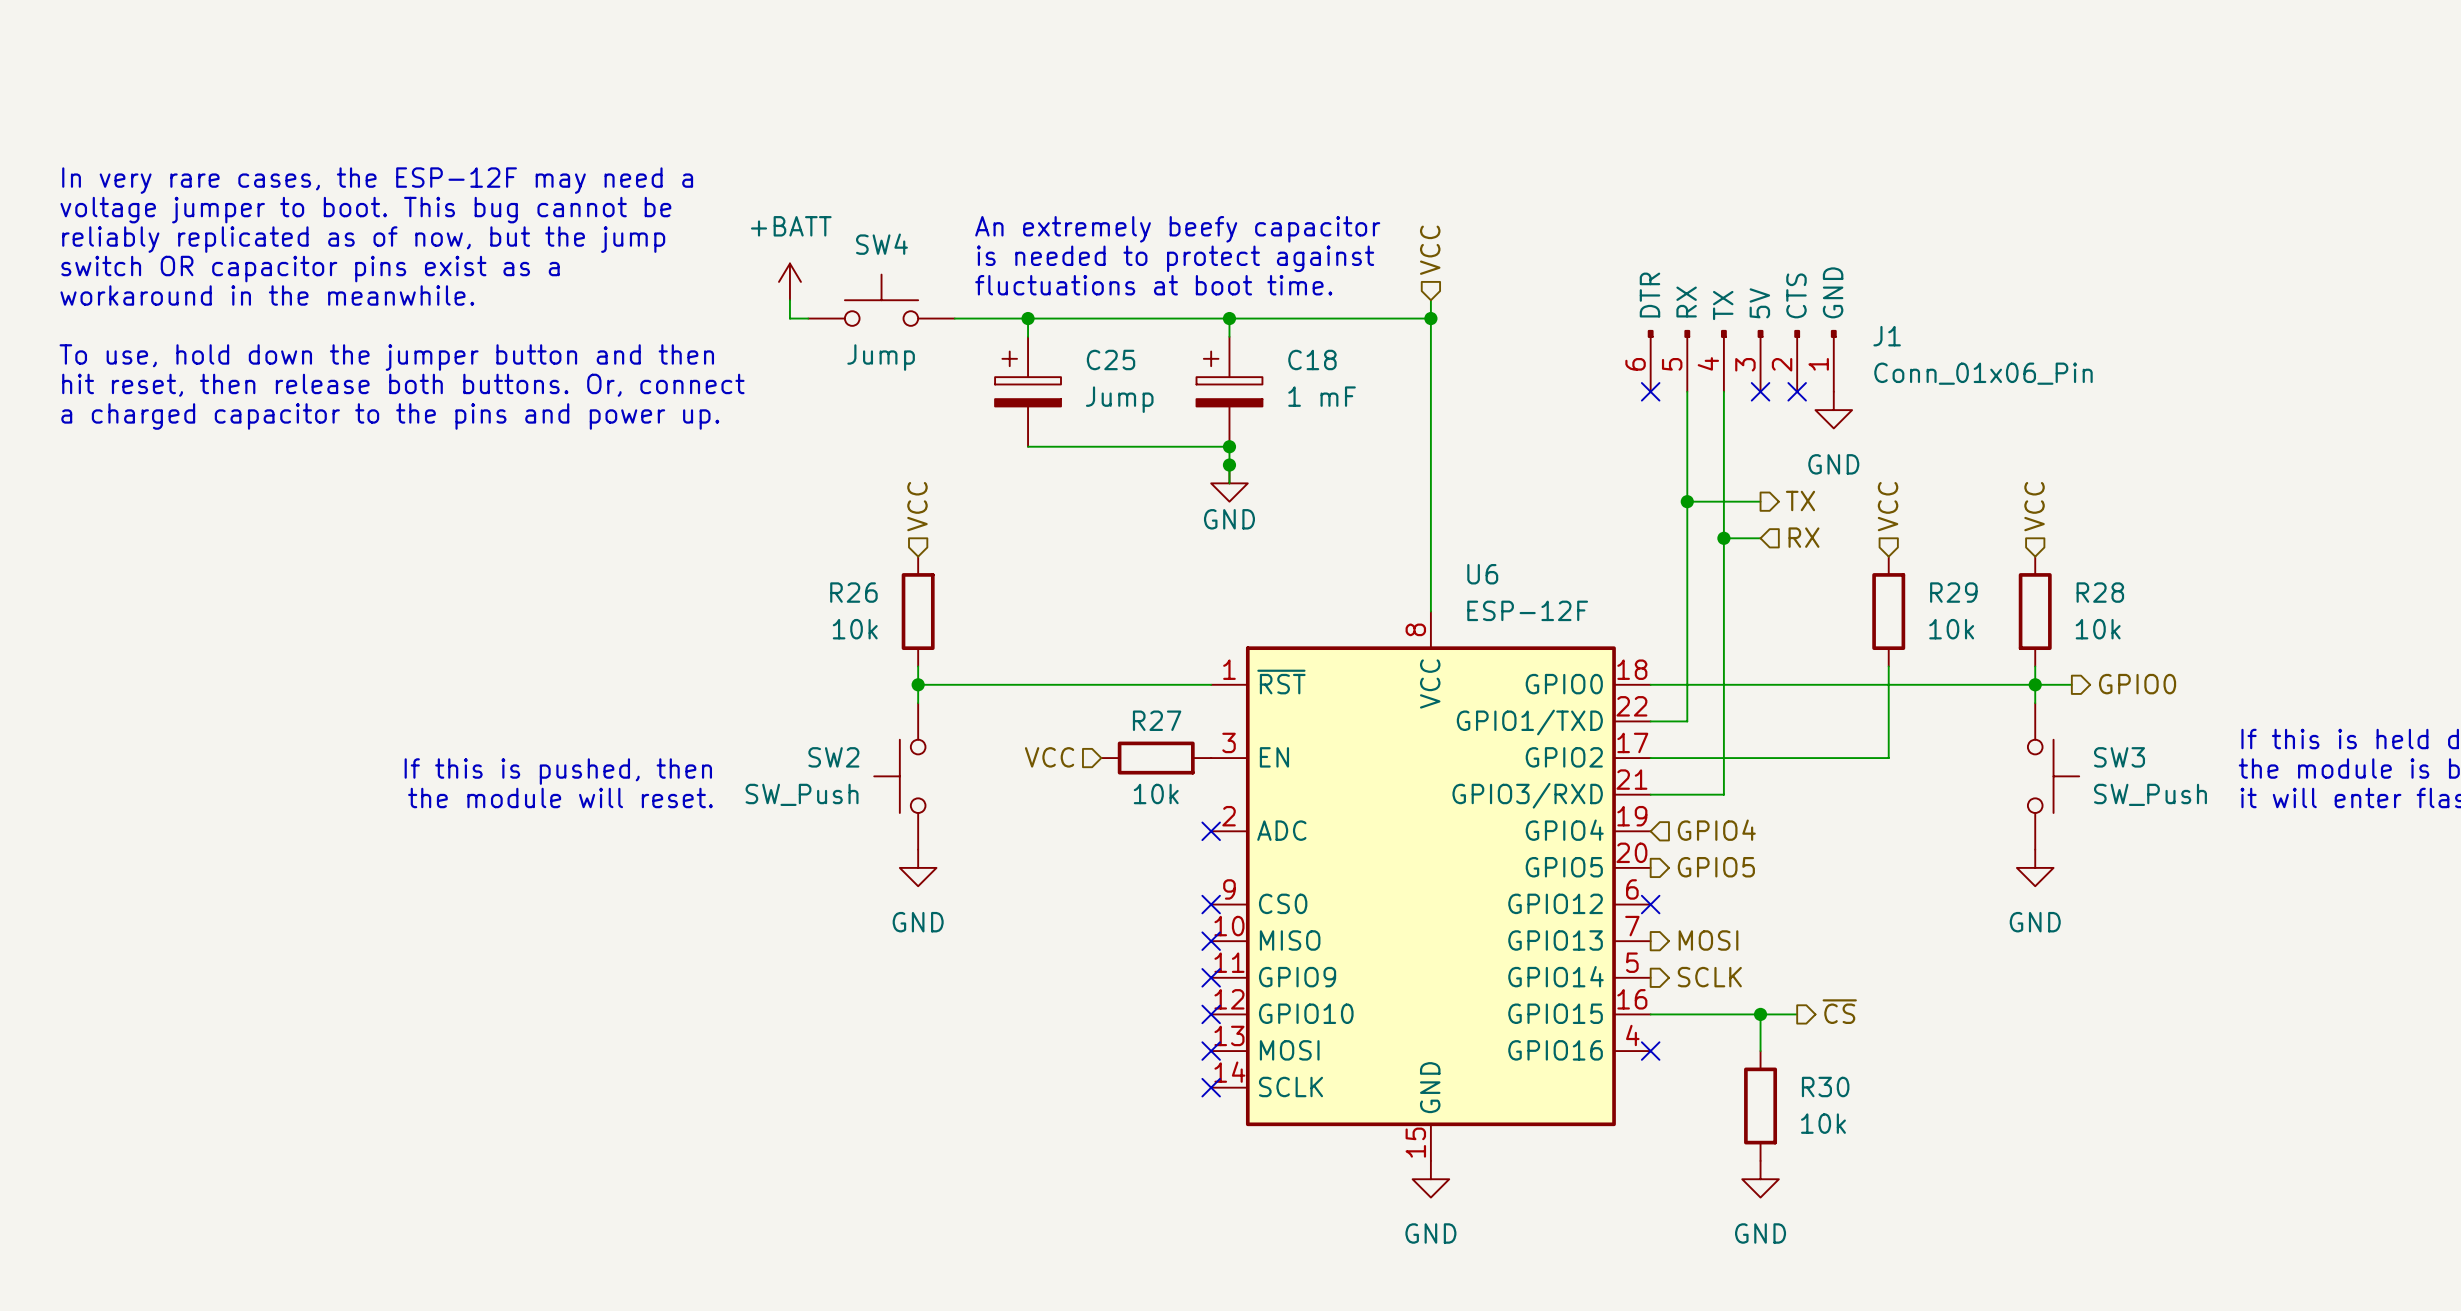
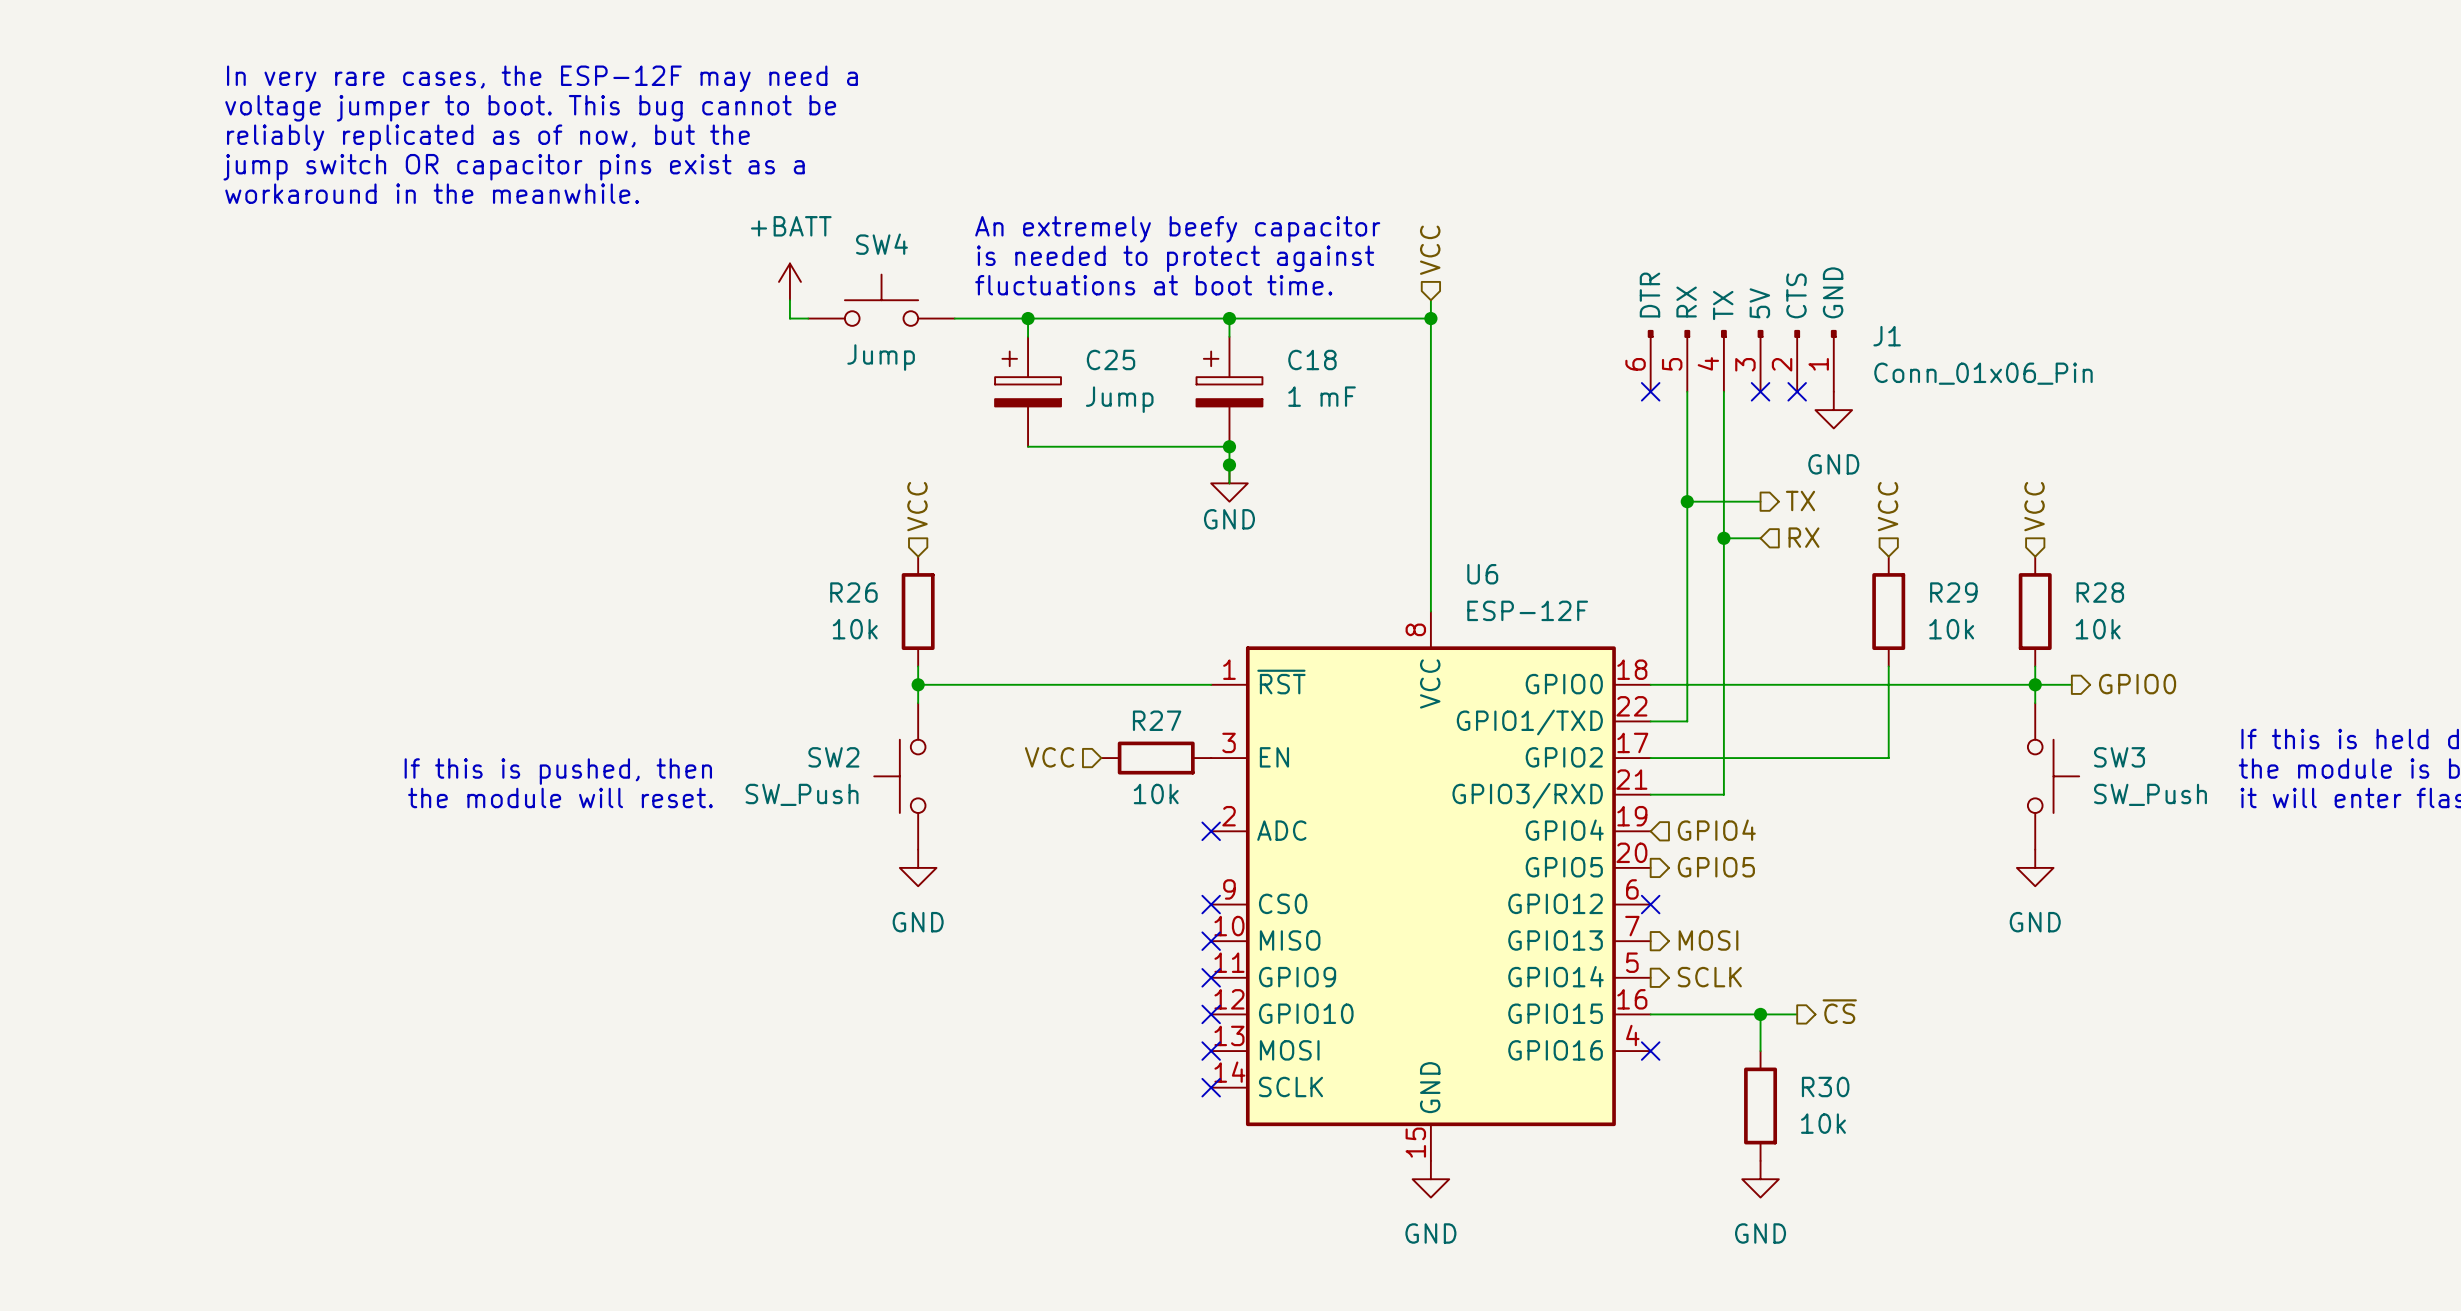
text: none -> reliably replicated as of now, but the (488, 137)
text: none -> jump switch OR capacitor pins exist as a (514, 167)
text position: In very rare cases, the ESP-12F may need a (377, 180) -> In very rare cases, the ESP-12F may need a (542, 78)
text position: voltage jumper to boot. This bug cannot be (365, 210) -> voltage jumper to boot. This bug cannot be (530, 108)
text: reliably replicated as of now, but the jump (363, 239) -> none
text: switch OR capacitor pins exist as a (310, 269) -> none
text position: workaround in the meanwhile. (267, 295) -> workaround in the meanwhile. (432, 193)
text: To use, hold down the jumper button and then (386, 357) -> none
text: hit reset, then release both buttons. Or, connect (403, 385) -> none
text: a charged capacitor to the pins and power up. (390, 416) -> none

